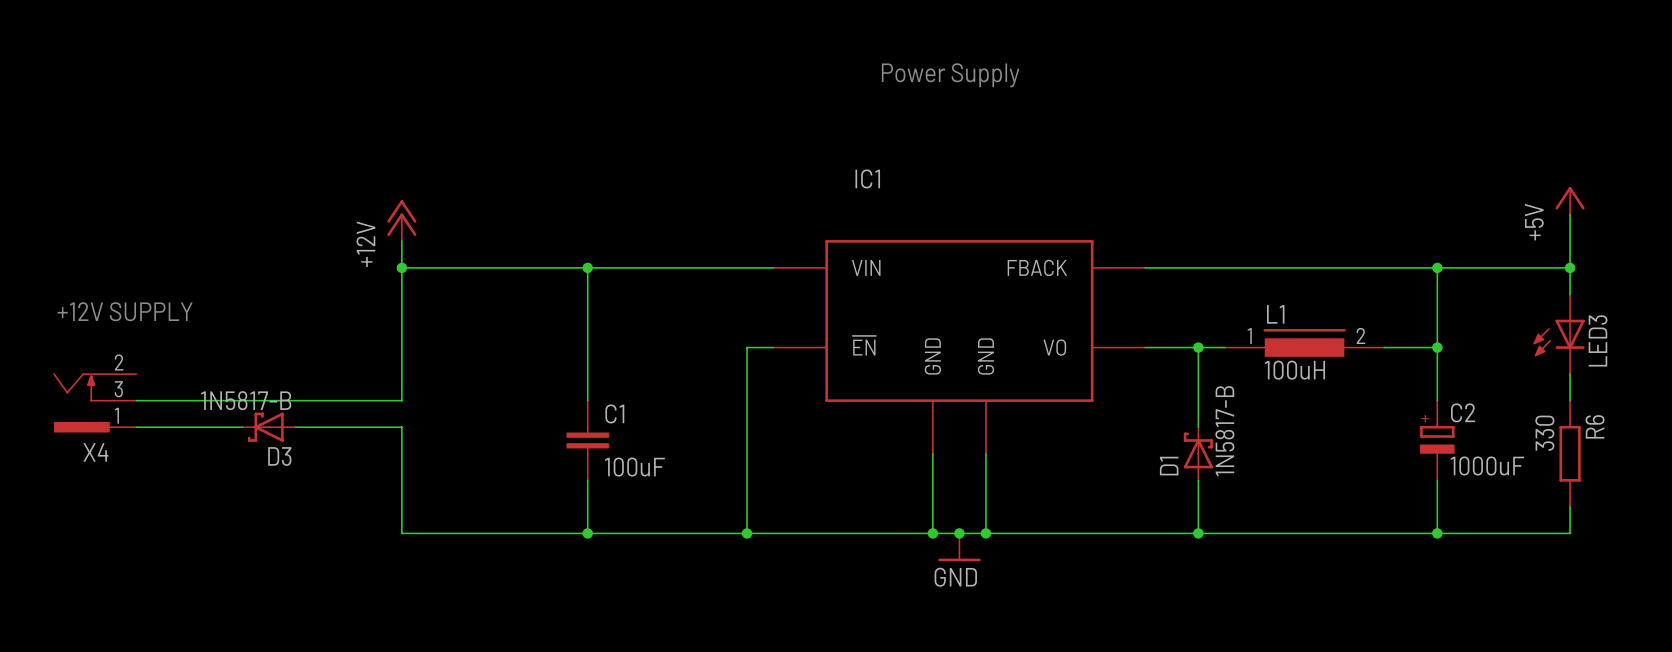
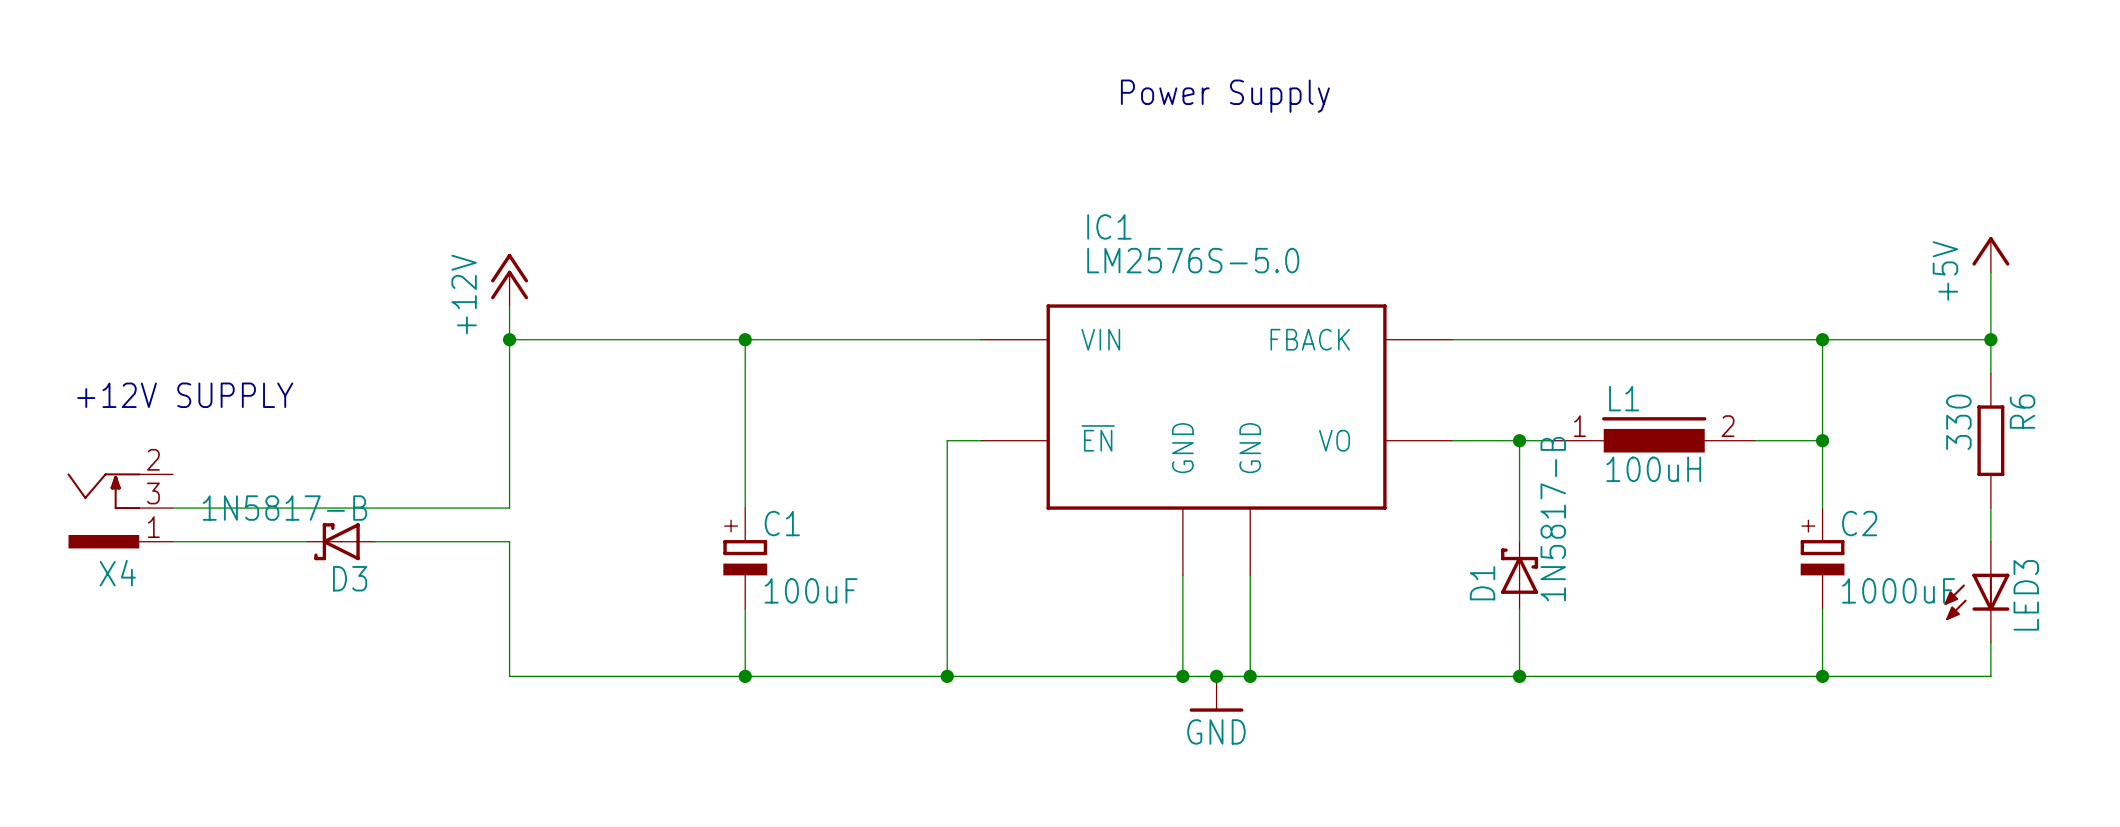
IC1 value: none -> LM2576S-5.0 (1193, 260)
LED3 position: (1559, 334) -> (1976, 592)
C1 symbol: [566, 400, 609, 481] -> [723, 508, 768, 610]
R6 position: (1570, 453) -> (1990, 440)

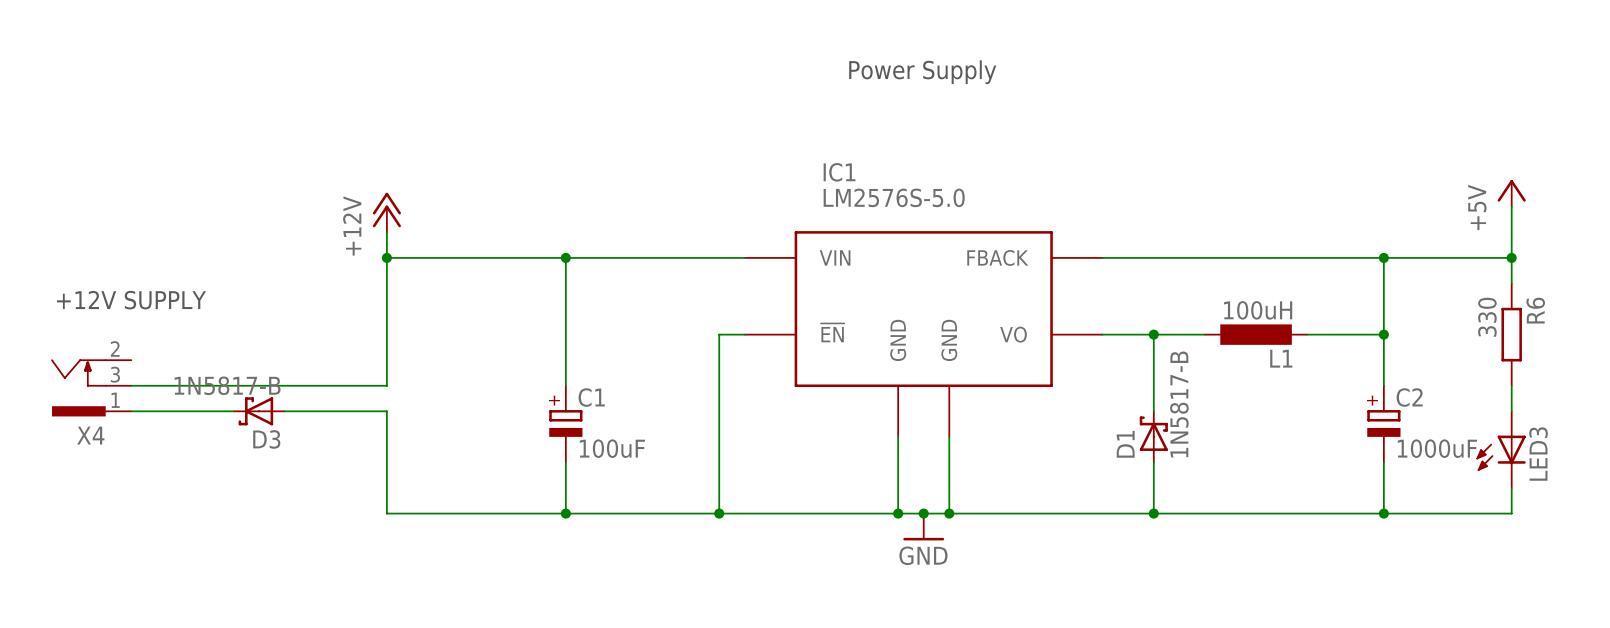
L1 name position: L1 (1624, 398) -> L1 (1281, 358)
L1 symbol: [1553, 417, 1756, 453] -> [1204, 324, 1308, 345]
L1 value position: 100uH (1653, 469) -> 100uH (1258, 310)

